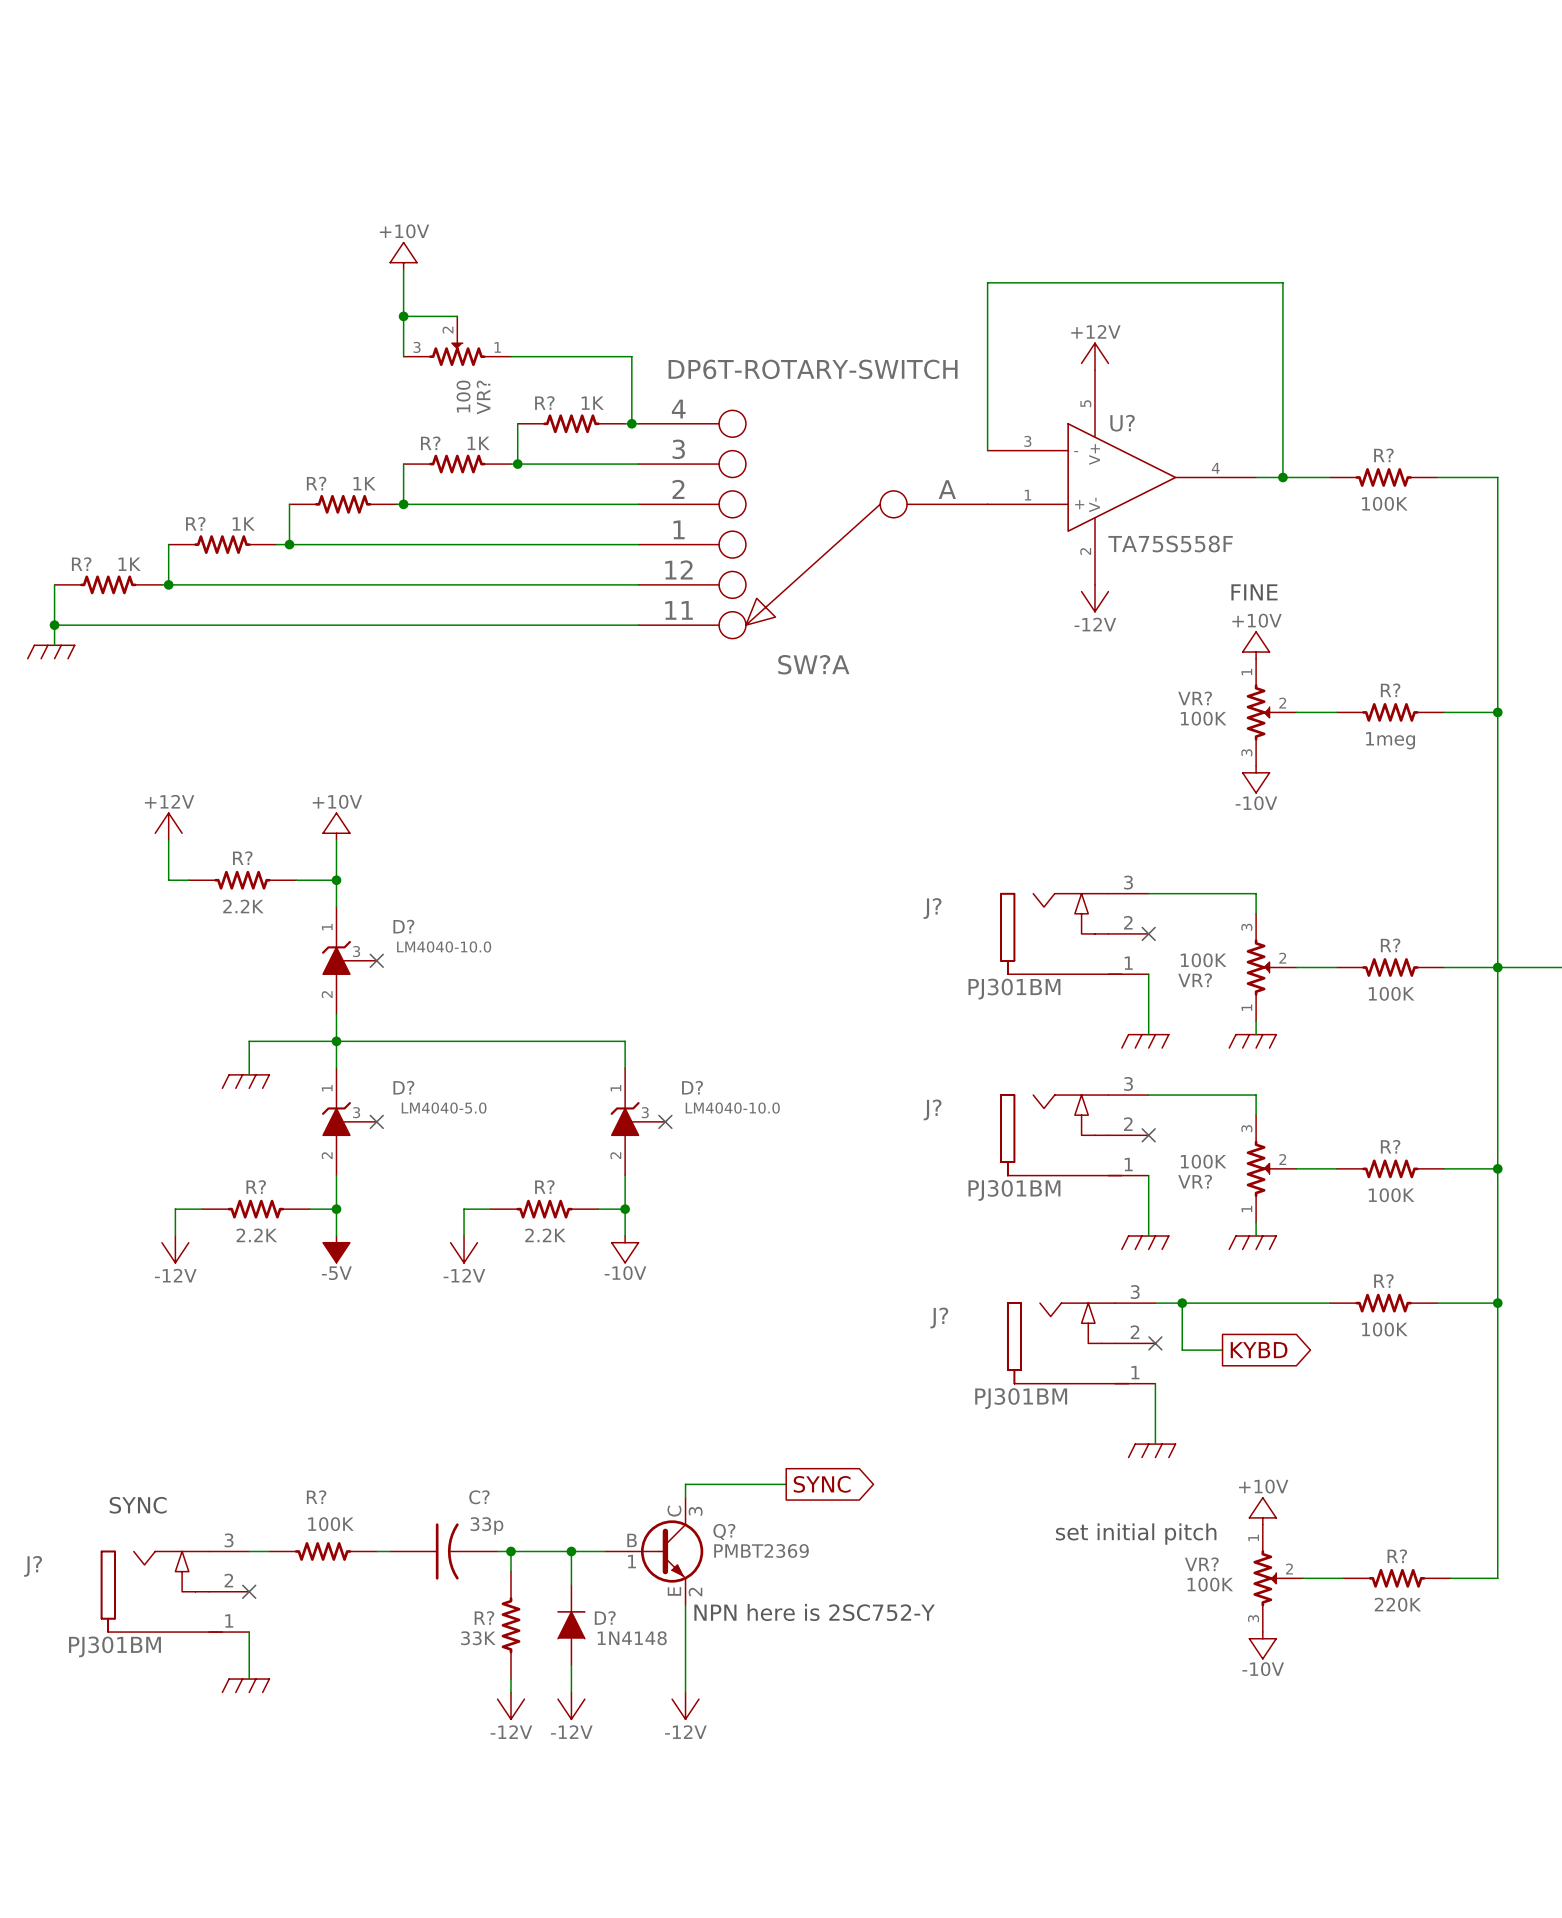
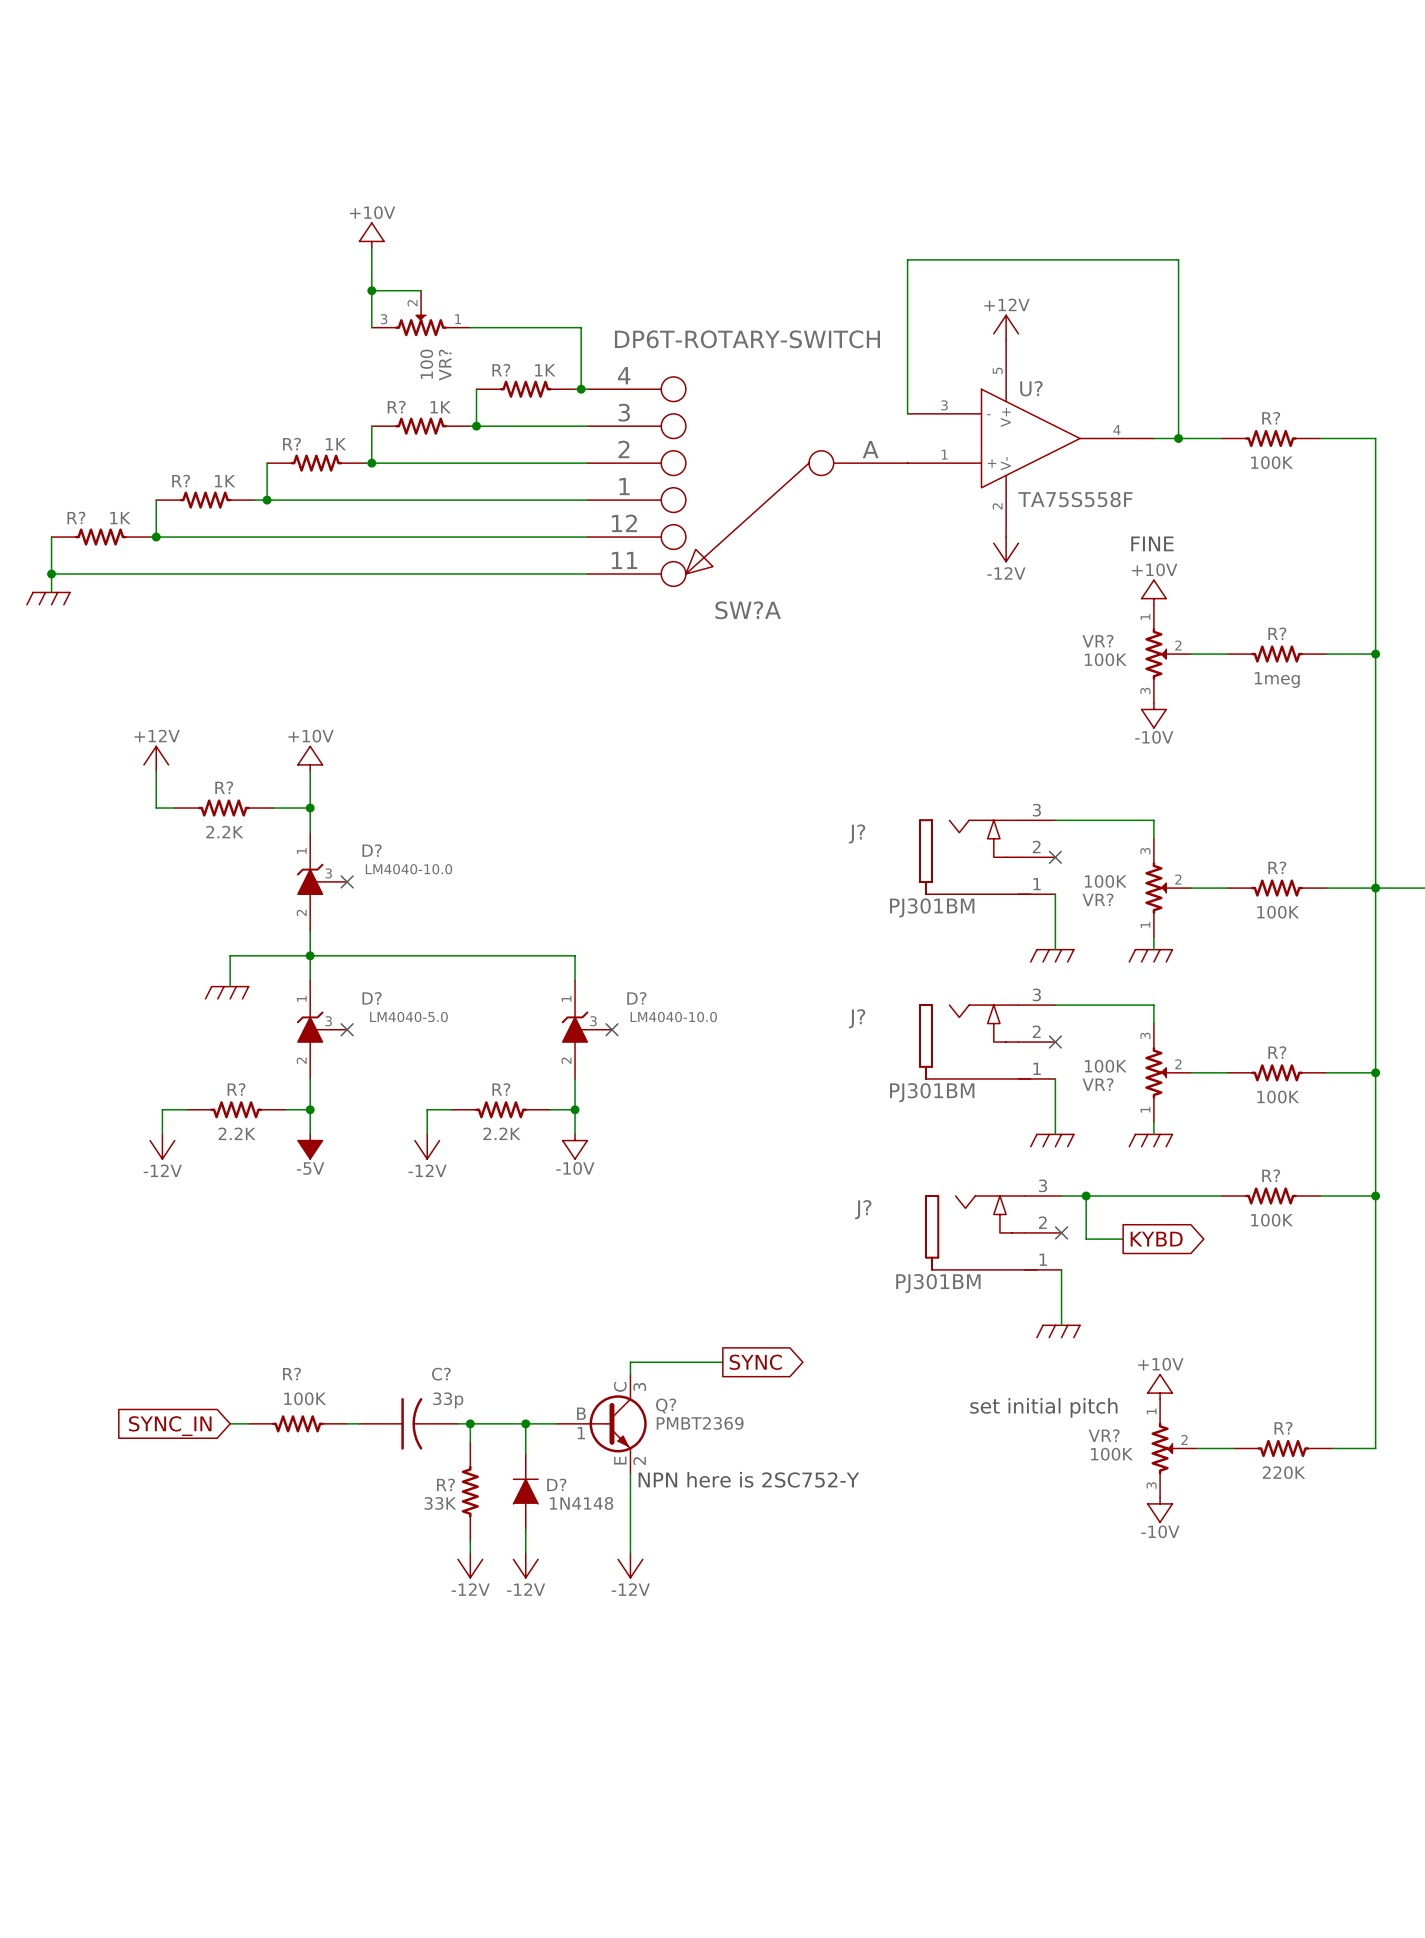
text: SYNC (138, 1505) -> none
global label: none -> SYNC_IN (170, 1426)
J?: PJ301BM (175, 1591) -> none
no-connect mark: (249, 1591) -> none
wire: (249, 1632) (249, 1679) -> none
power symbol: (245, 1685) -> none

